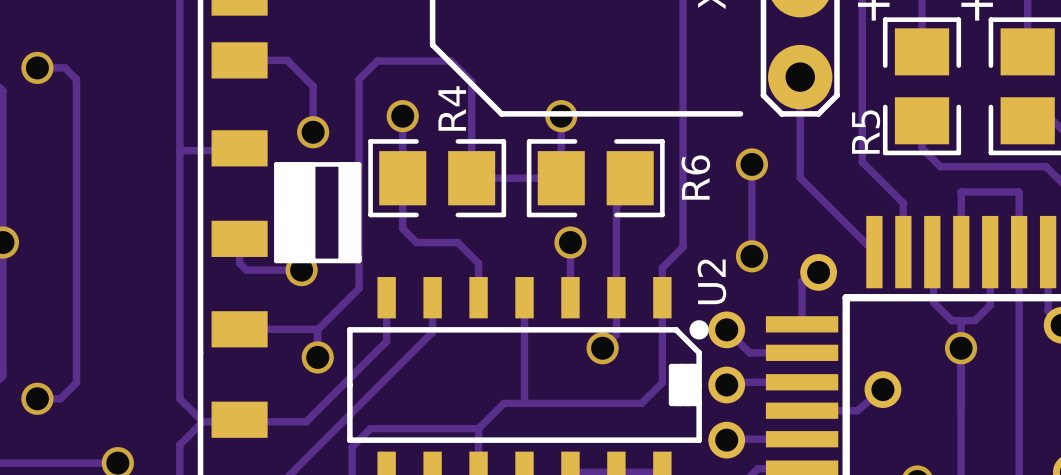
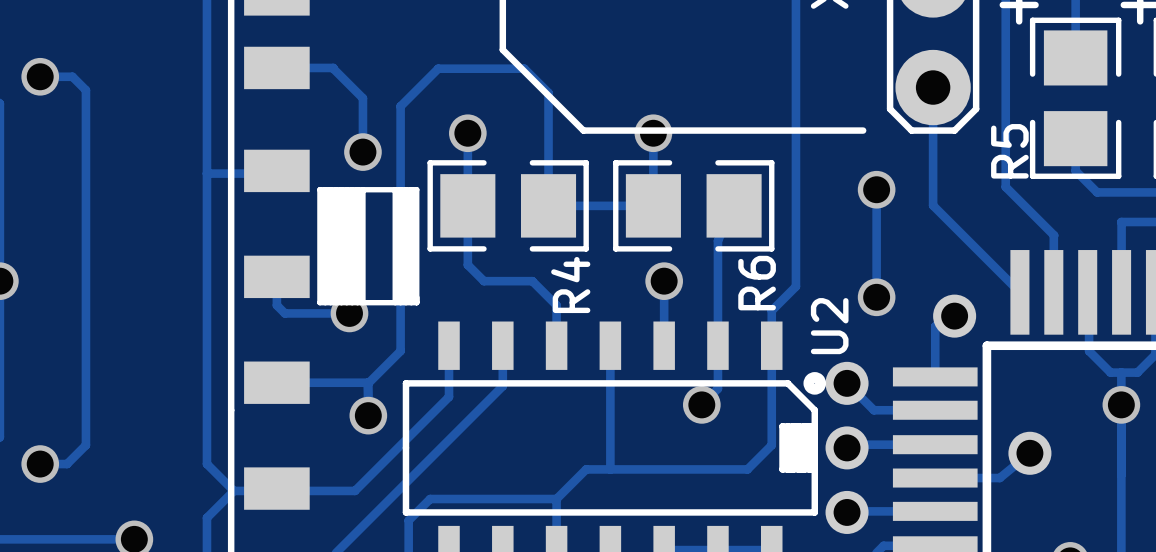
track: (359, 79) (359, 288) (345, 302) -> (416, 90) (400, 106) (400, 351)
R4 name position: R4 (452, 108) -> R4 (570, 285)
R6 name position: R6 (695, 177) -> R6 (757, 283)

